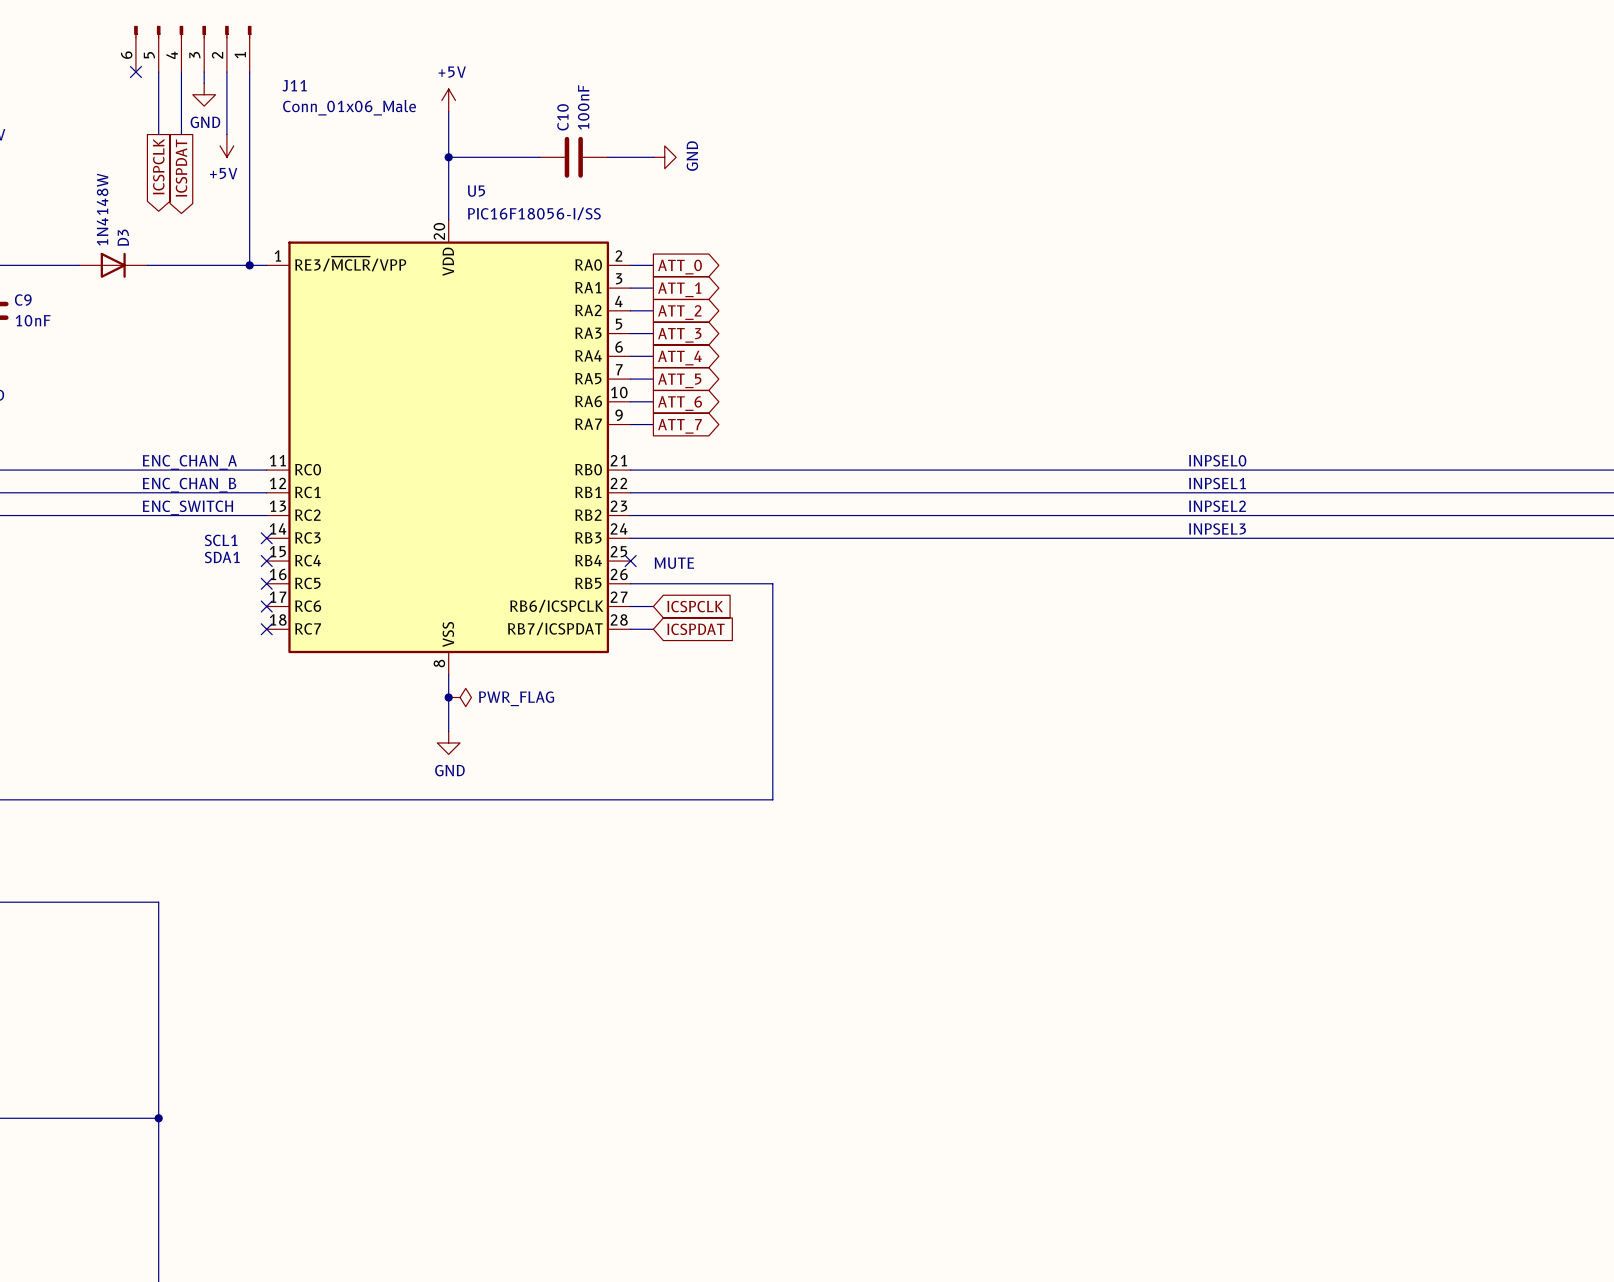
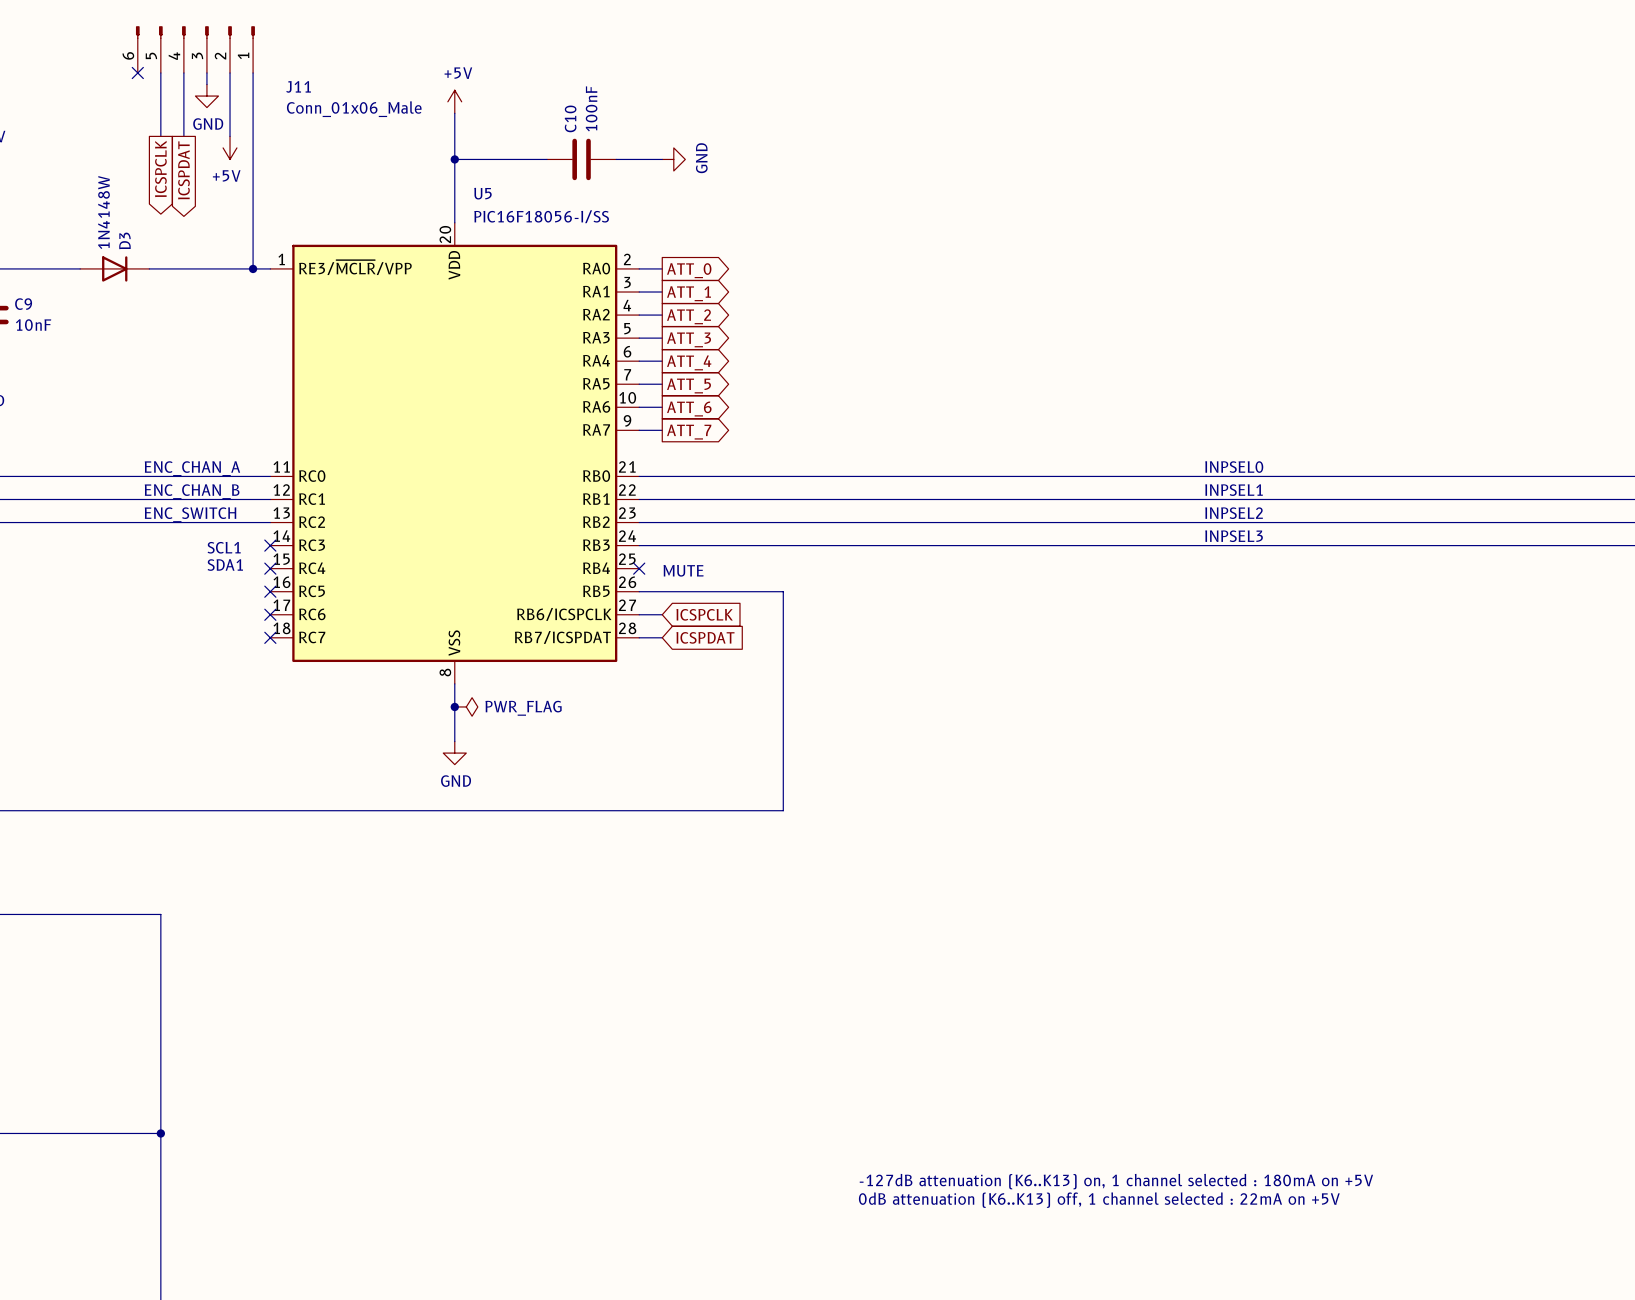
text: none -> -127dB attenuation (K6..K13) on, 1 channel selected : 180mA on +5V (1116, 1181)
text: none -> 0dB attenuation (K6..K13) off, 1 channel selected : 22mA on +5V (1099, 1200)

